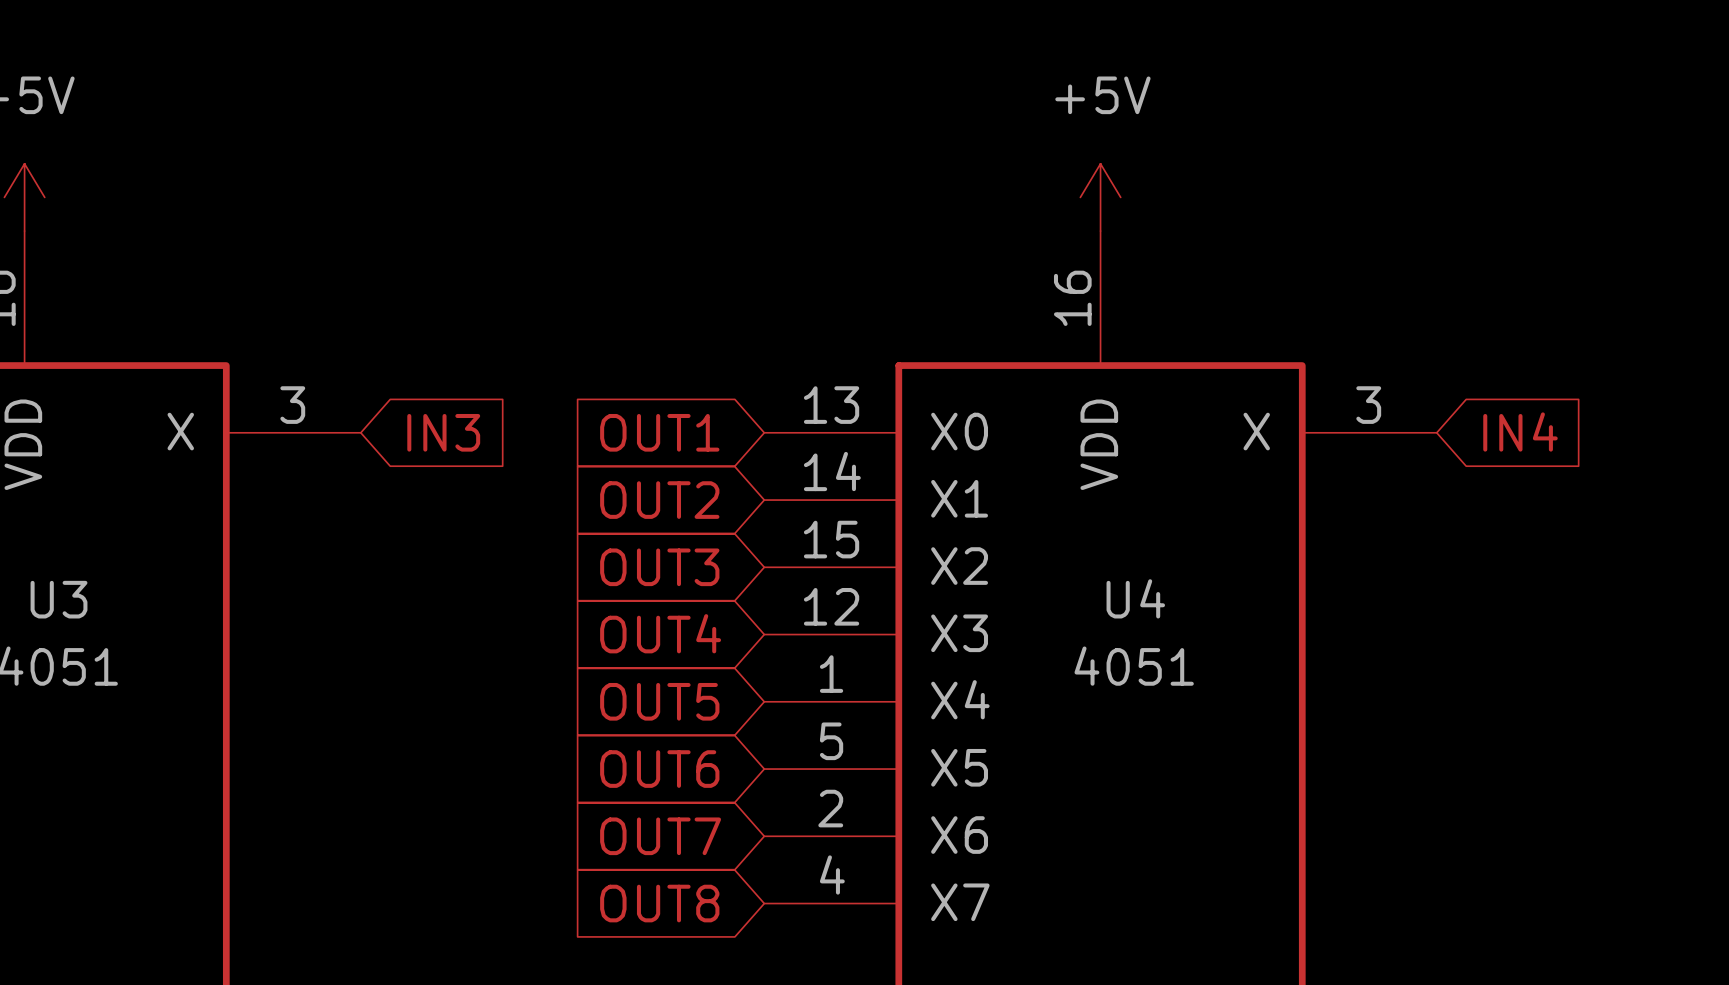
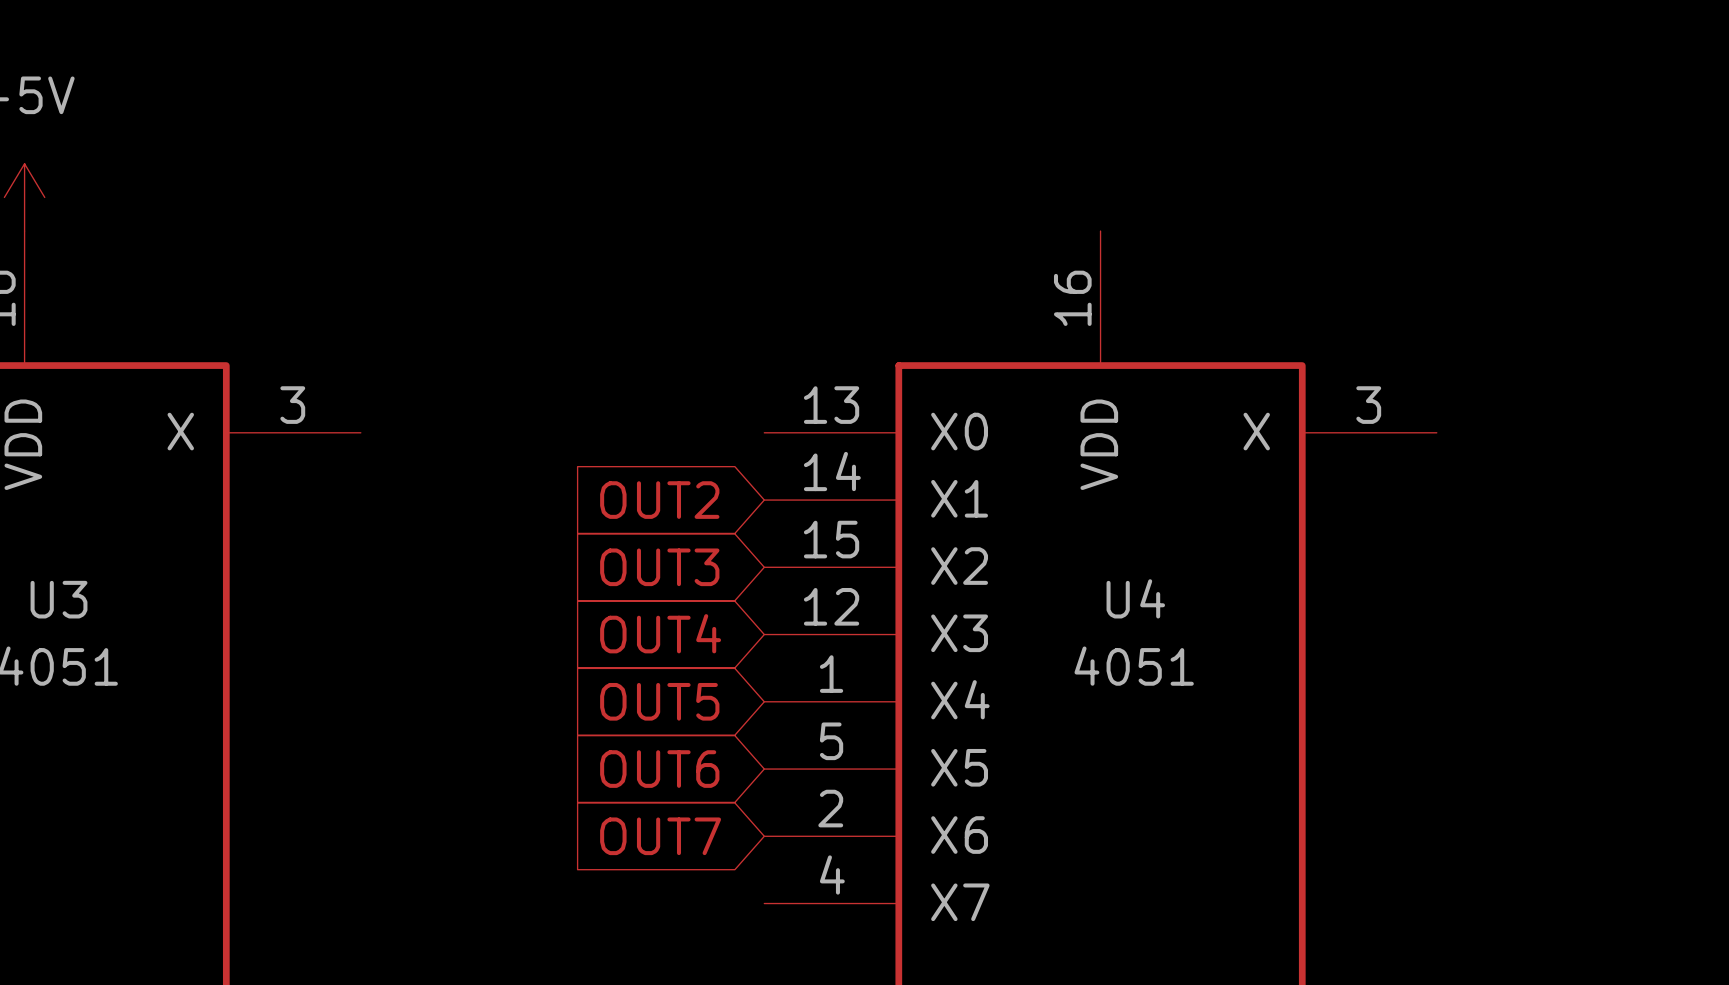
power symbol: +5V (1100, 197) -> none
global label: IN3 (443, 432) -> none
global label: OUT1 (659, 432) -> none
global label: IN4 (1520, 432) -> none
global label: OUT8 (659, 903) -> none

